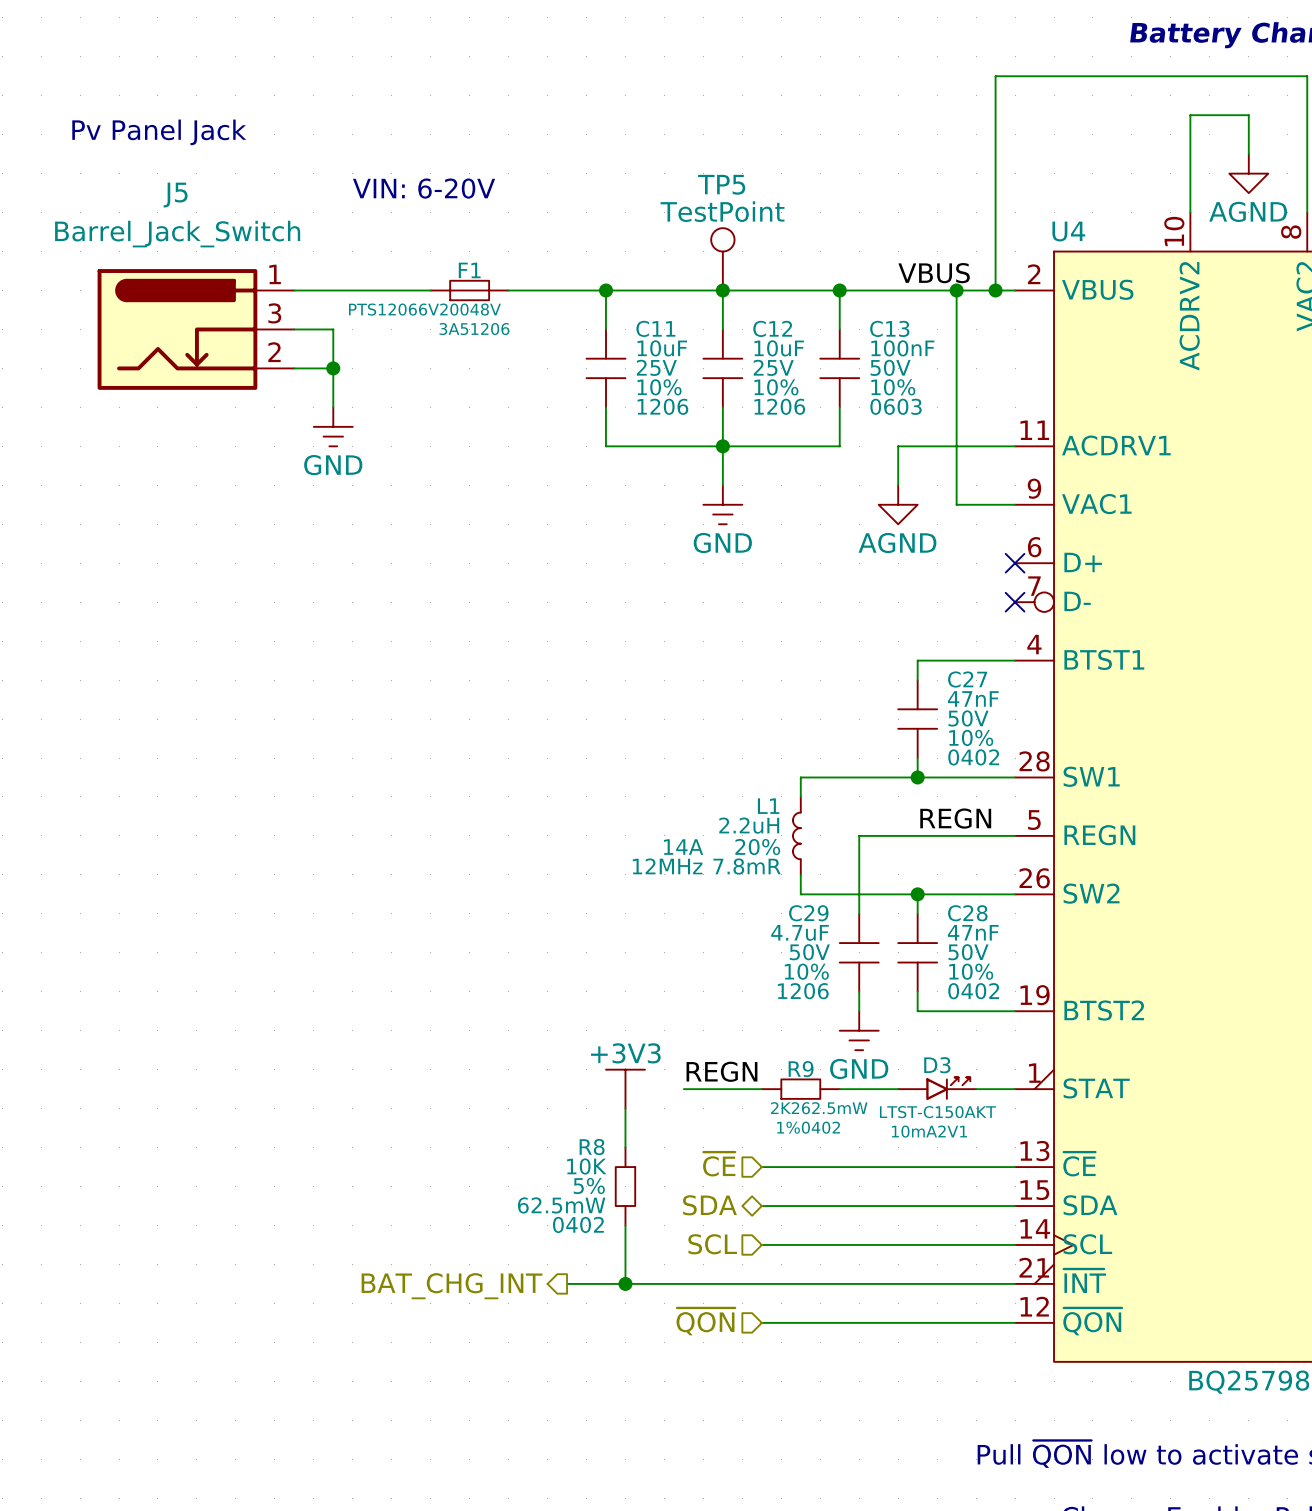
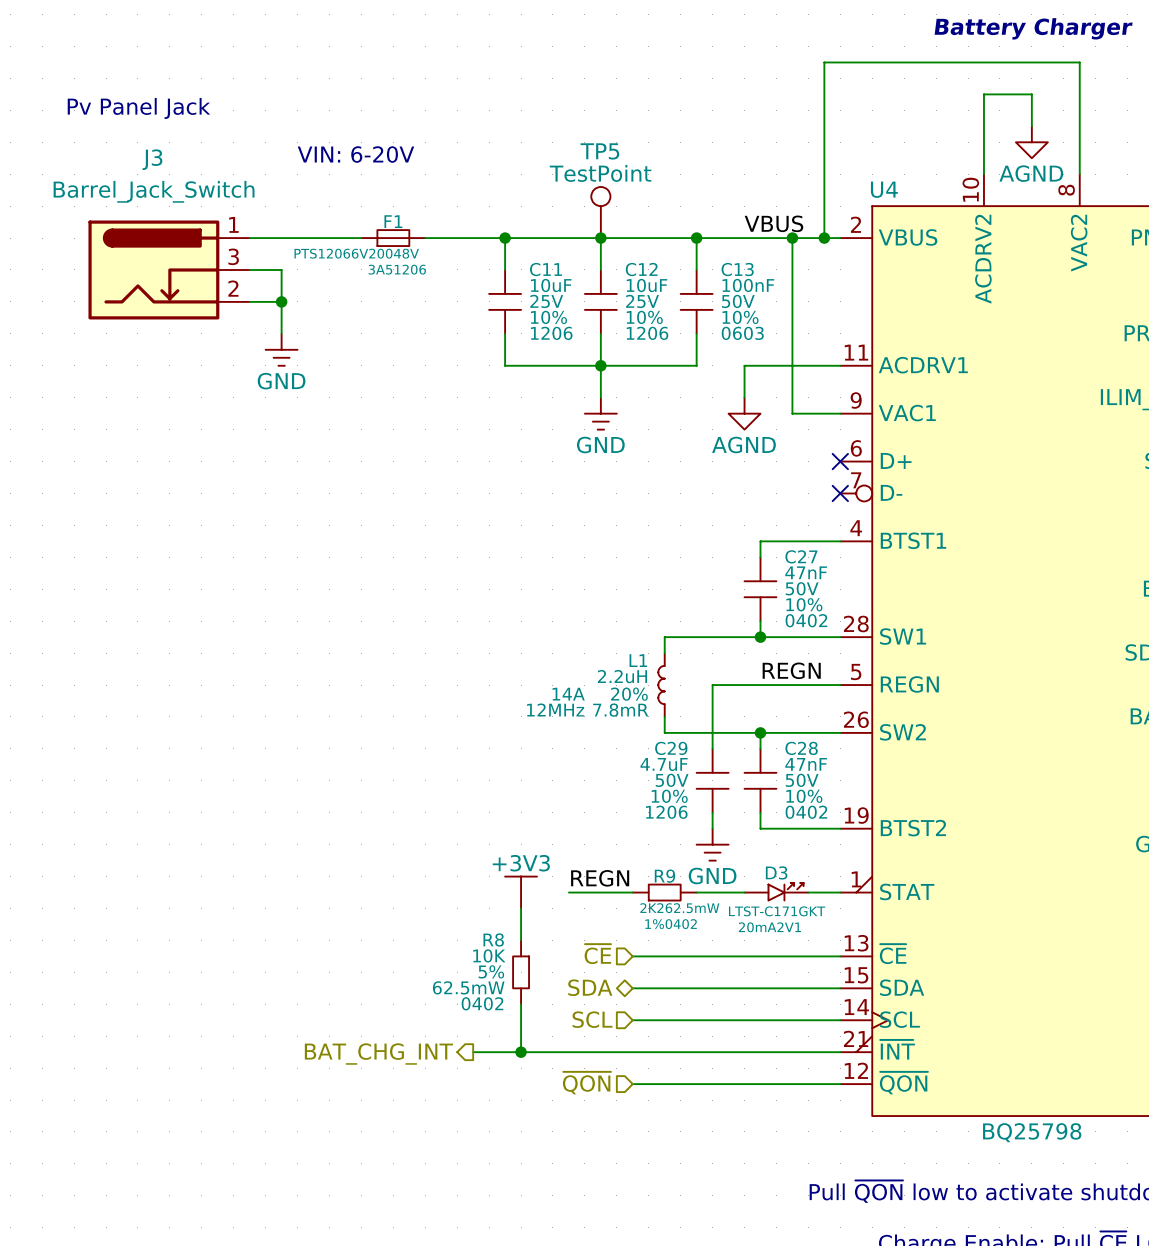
J5 name: J5 (175, 195) -> J3 (152, 159)
D3 value: LTST-C150AKT (937, 1112) -> LTST-C171GKT (777, 911)
D3 text: 10mA (914, 1131) -> 20mA (757, 927)

